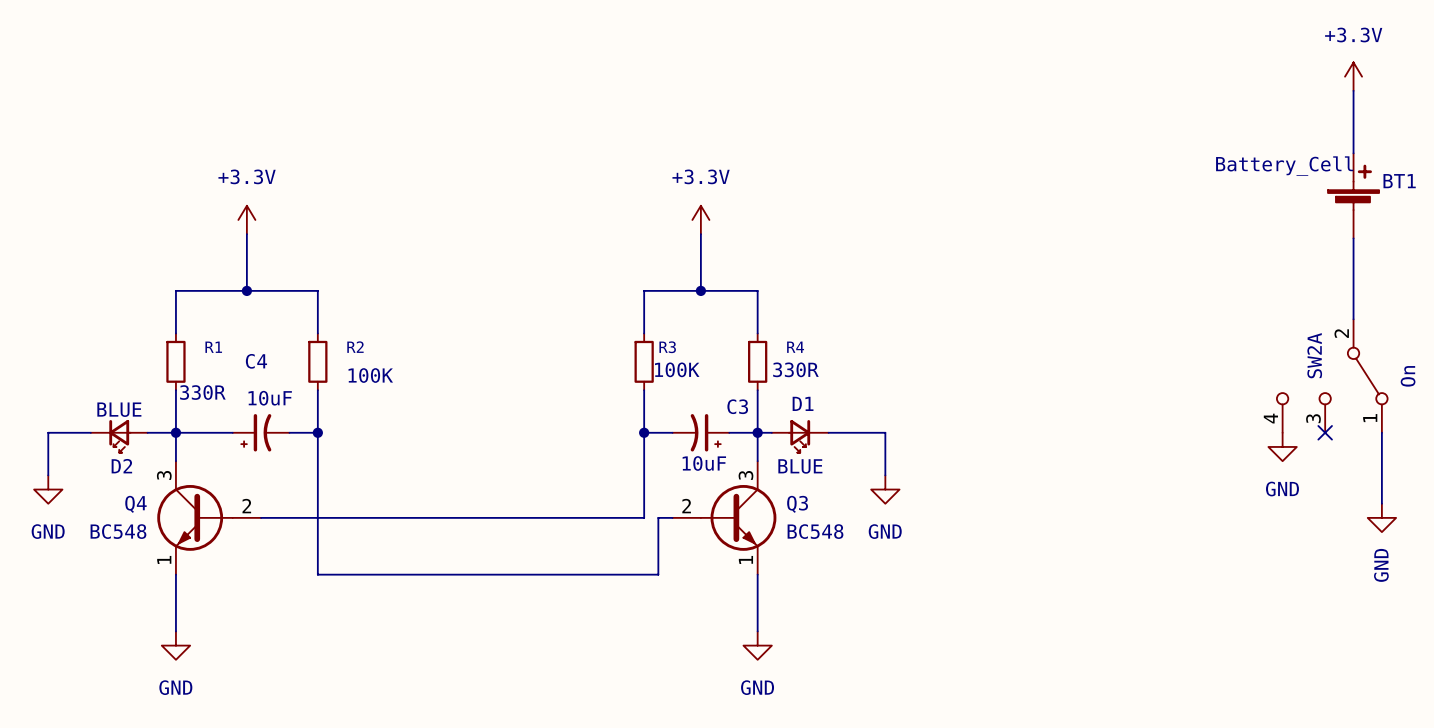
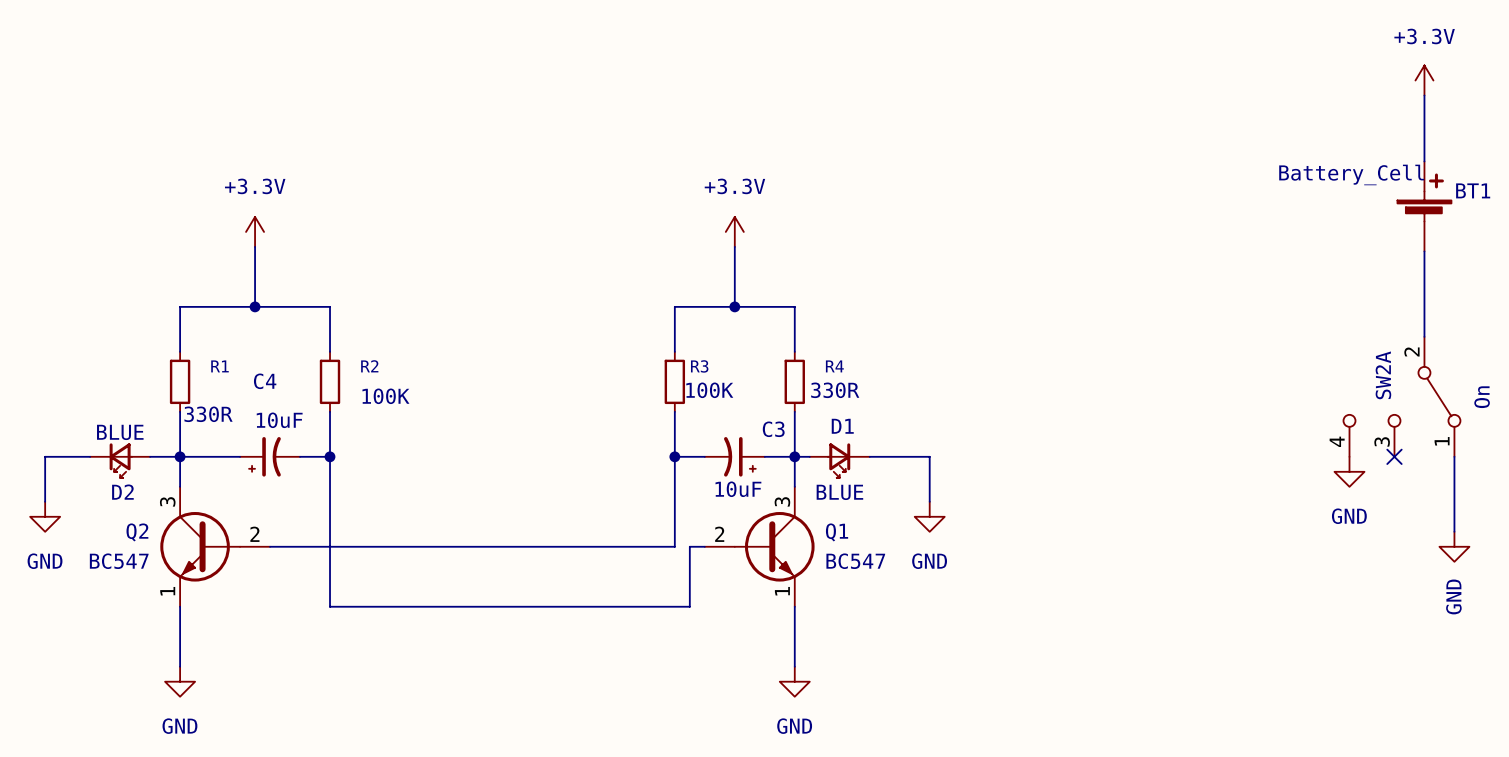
Q4 name: Q4 (135, 504) -> Q2 (137, 532)
Q3 name: Q3 (797, 504) -> Q1 (837, 532)
Q4 value: BC548 (118, 531) -> BC547 (119, 561)
Q3 value: BC548 (815, 531) -> BC547 (855, 561)

